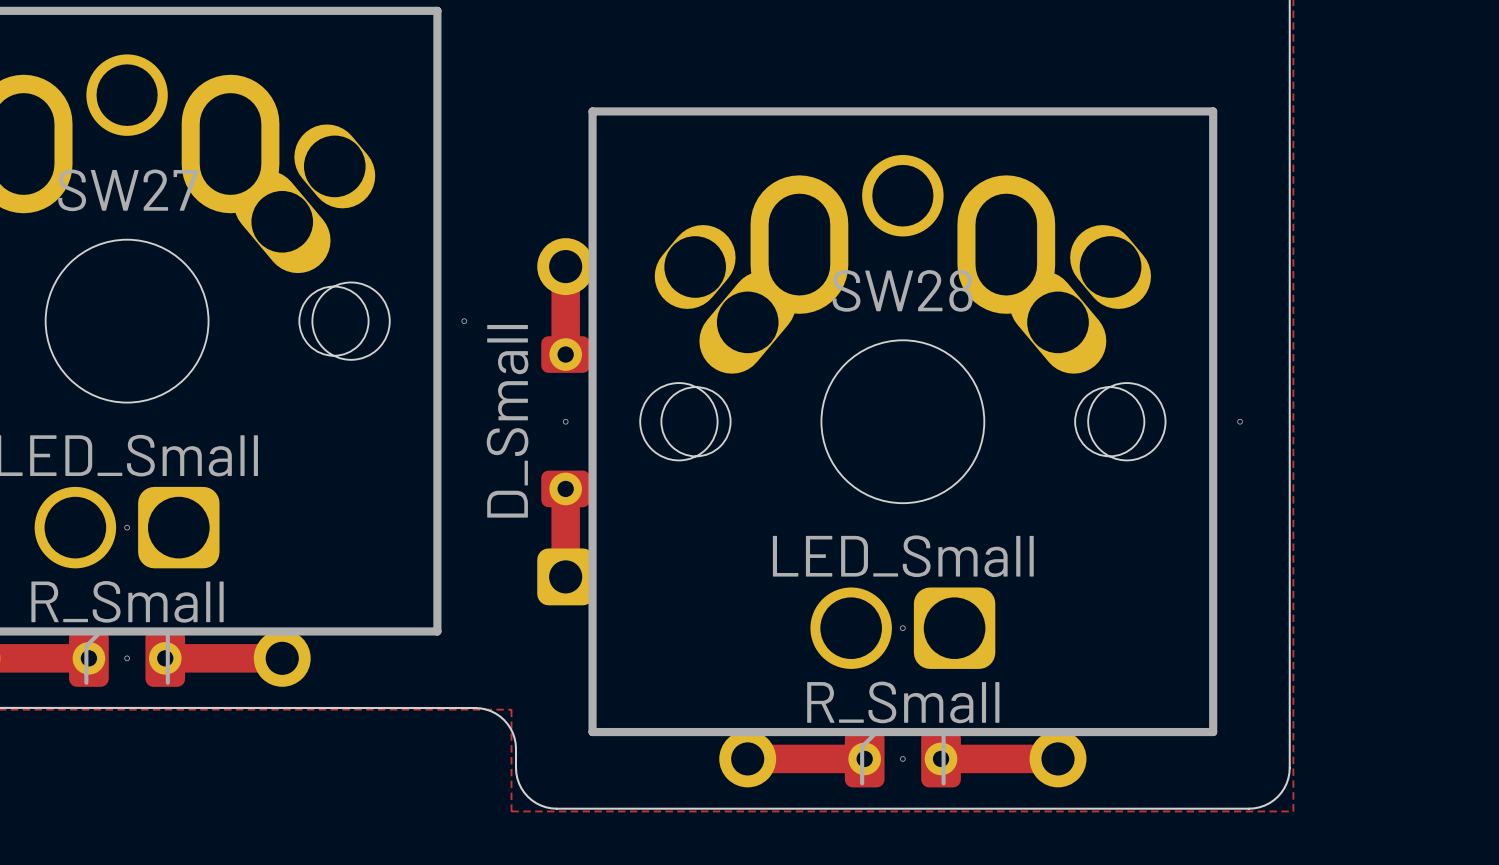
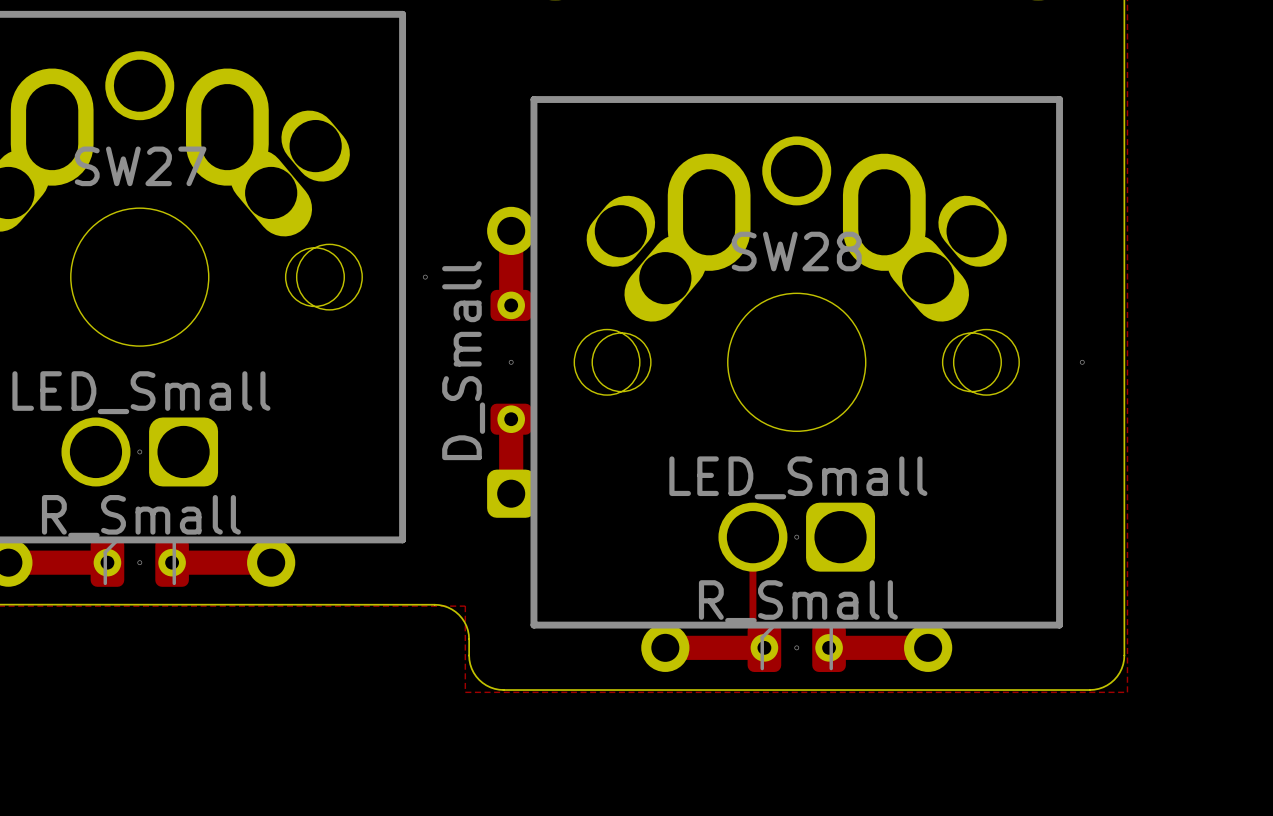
track: none -> (752, 537) (752, 636)

